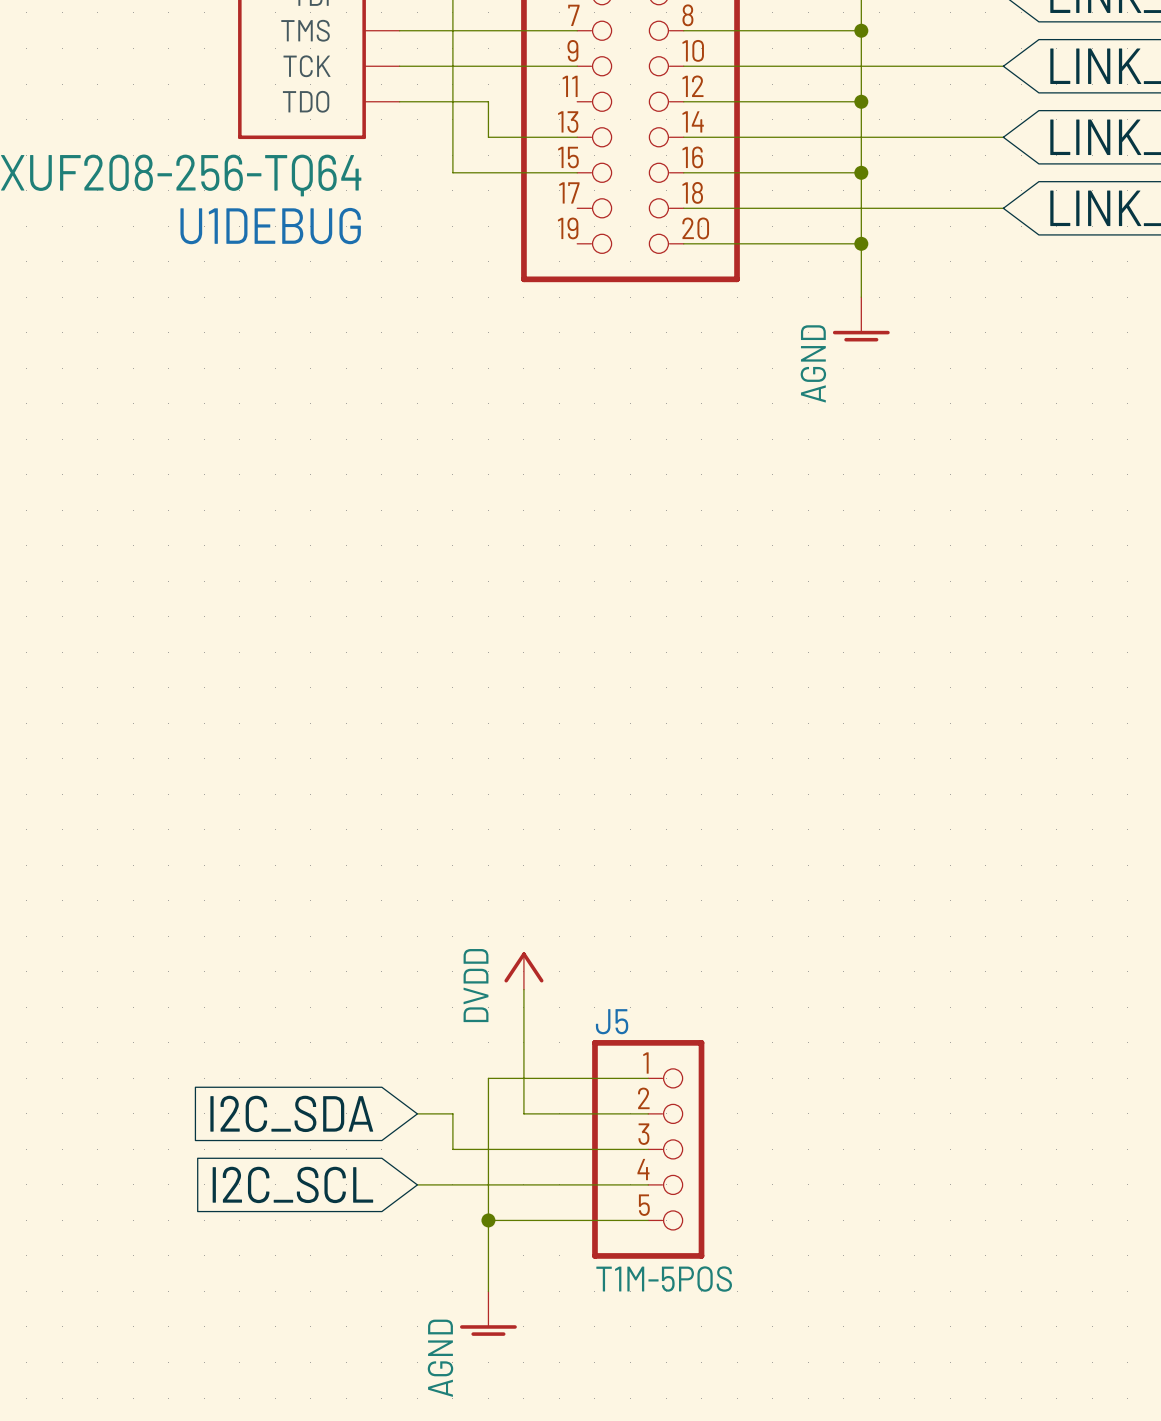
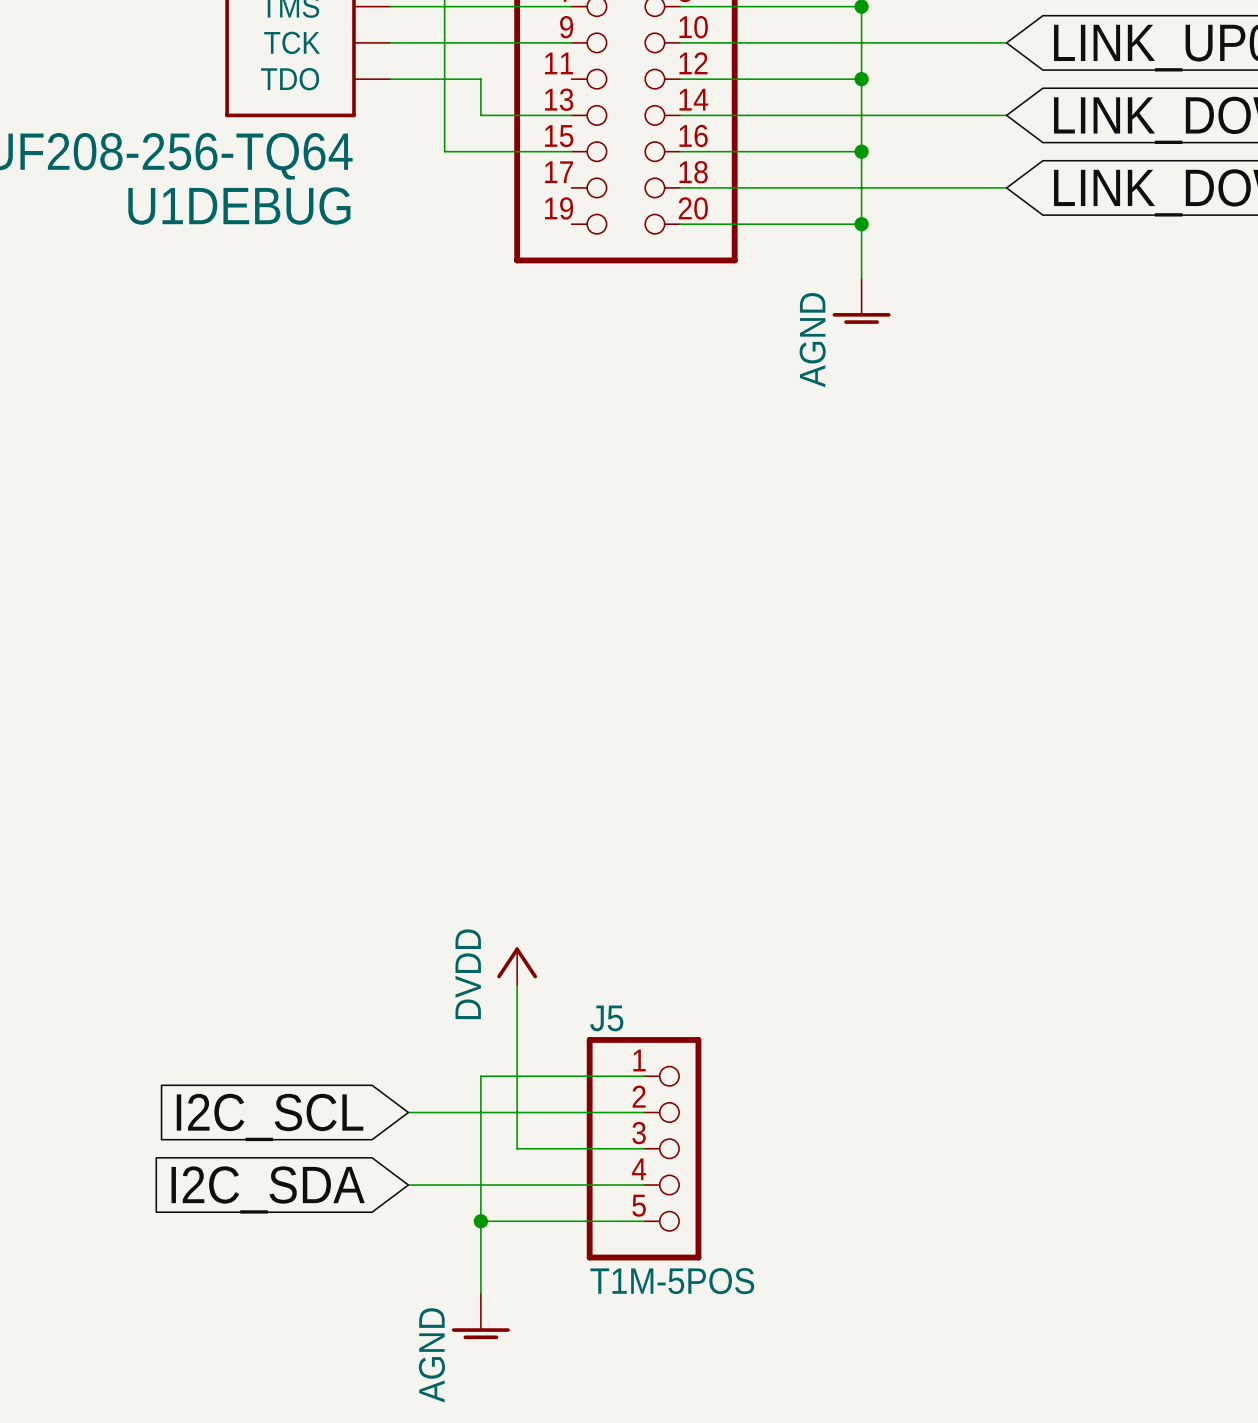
global label: I2C_SDA (291, 1113) -> I2C_SCL (270, 1117)
wire: (452, 1113) (452, 1149) (523, 1149) -> (444, 1112) (517, 1112) (517, 1148)
global label: I2C_SCL (292, 1184) -> I2C_SDA (268, 1189)

